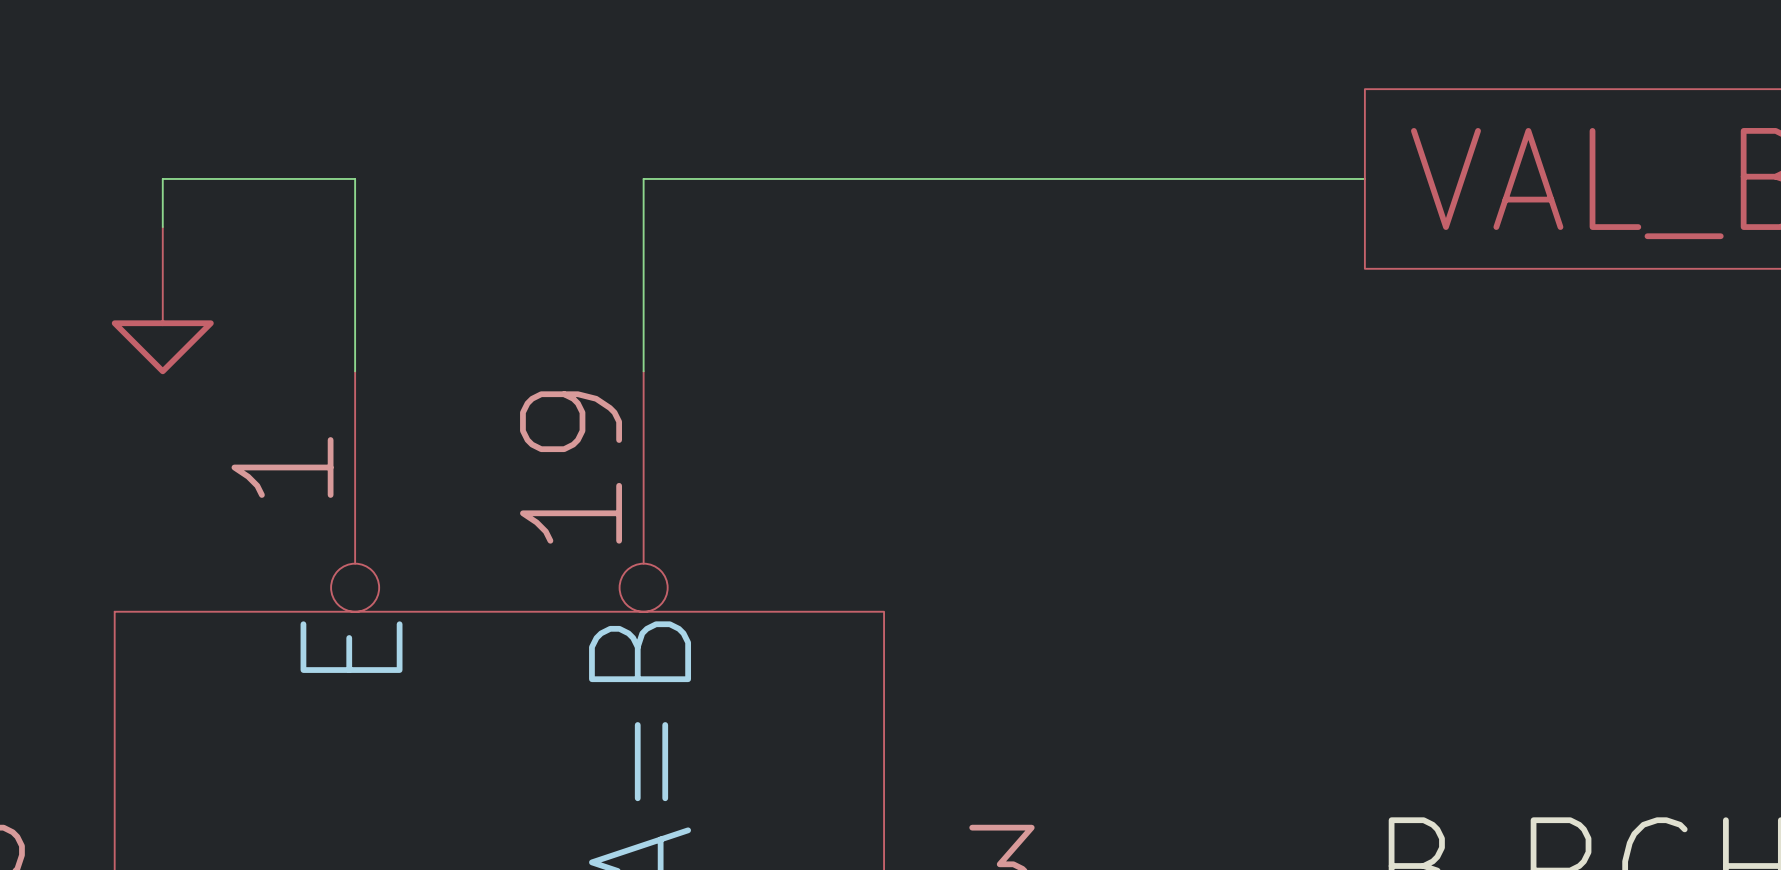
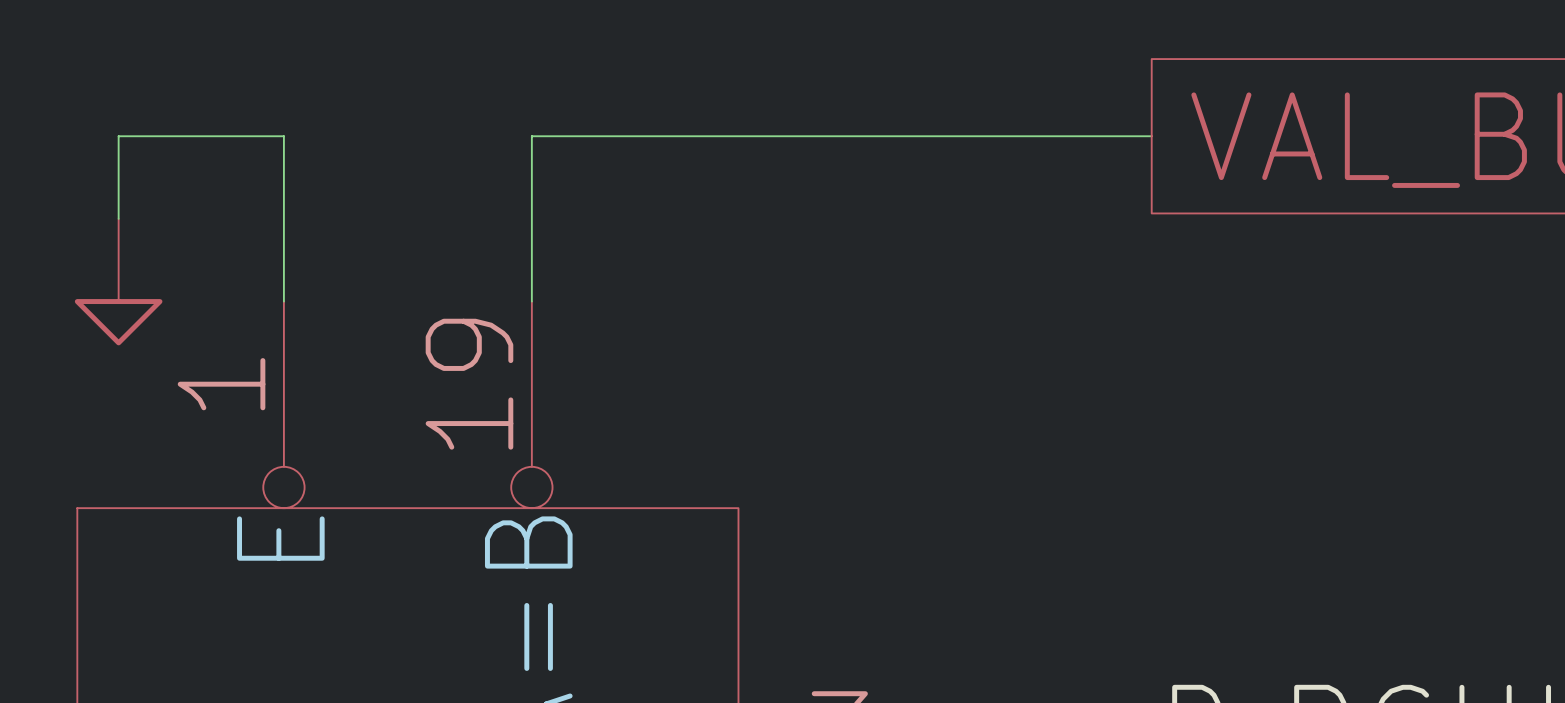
power symbol position: (162, 300) -> (118, 282)

